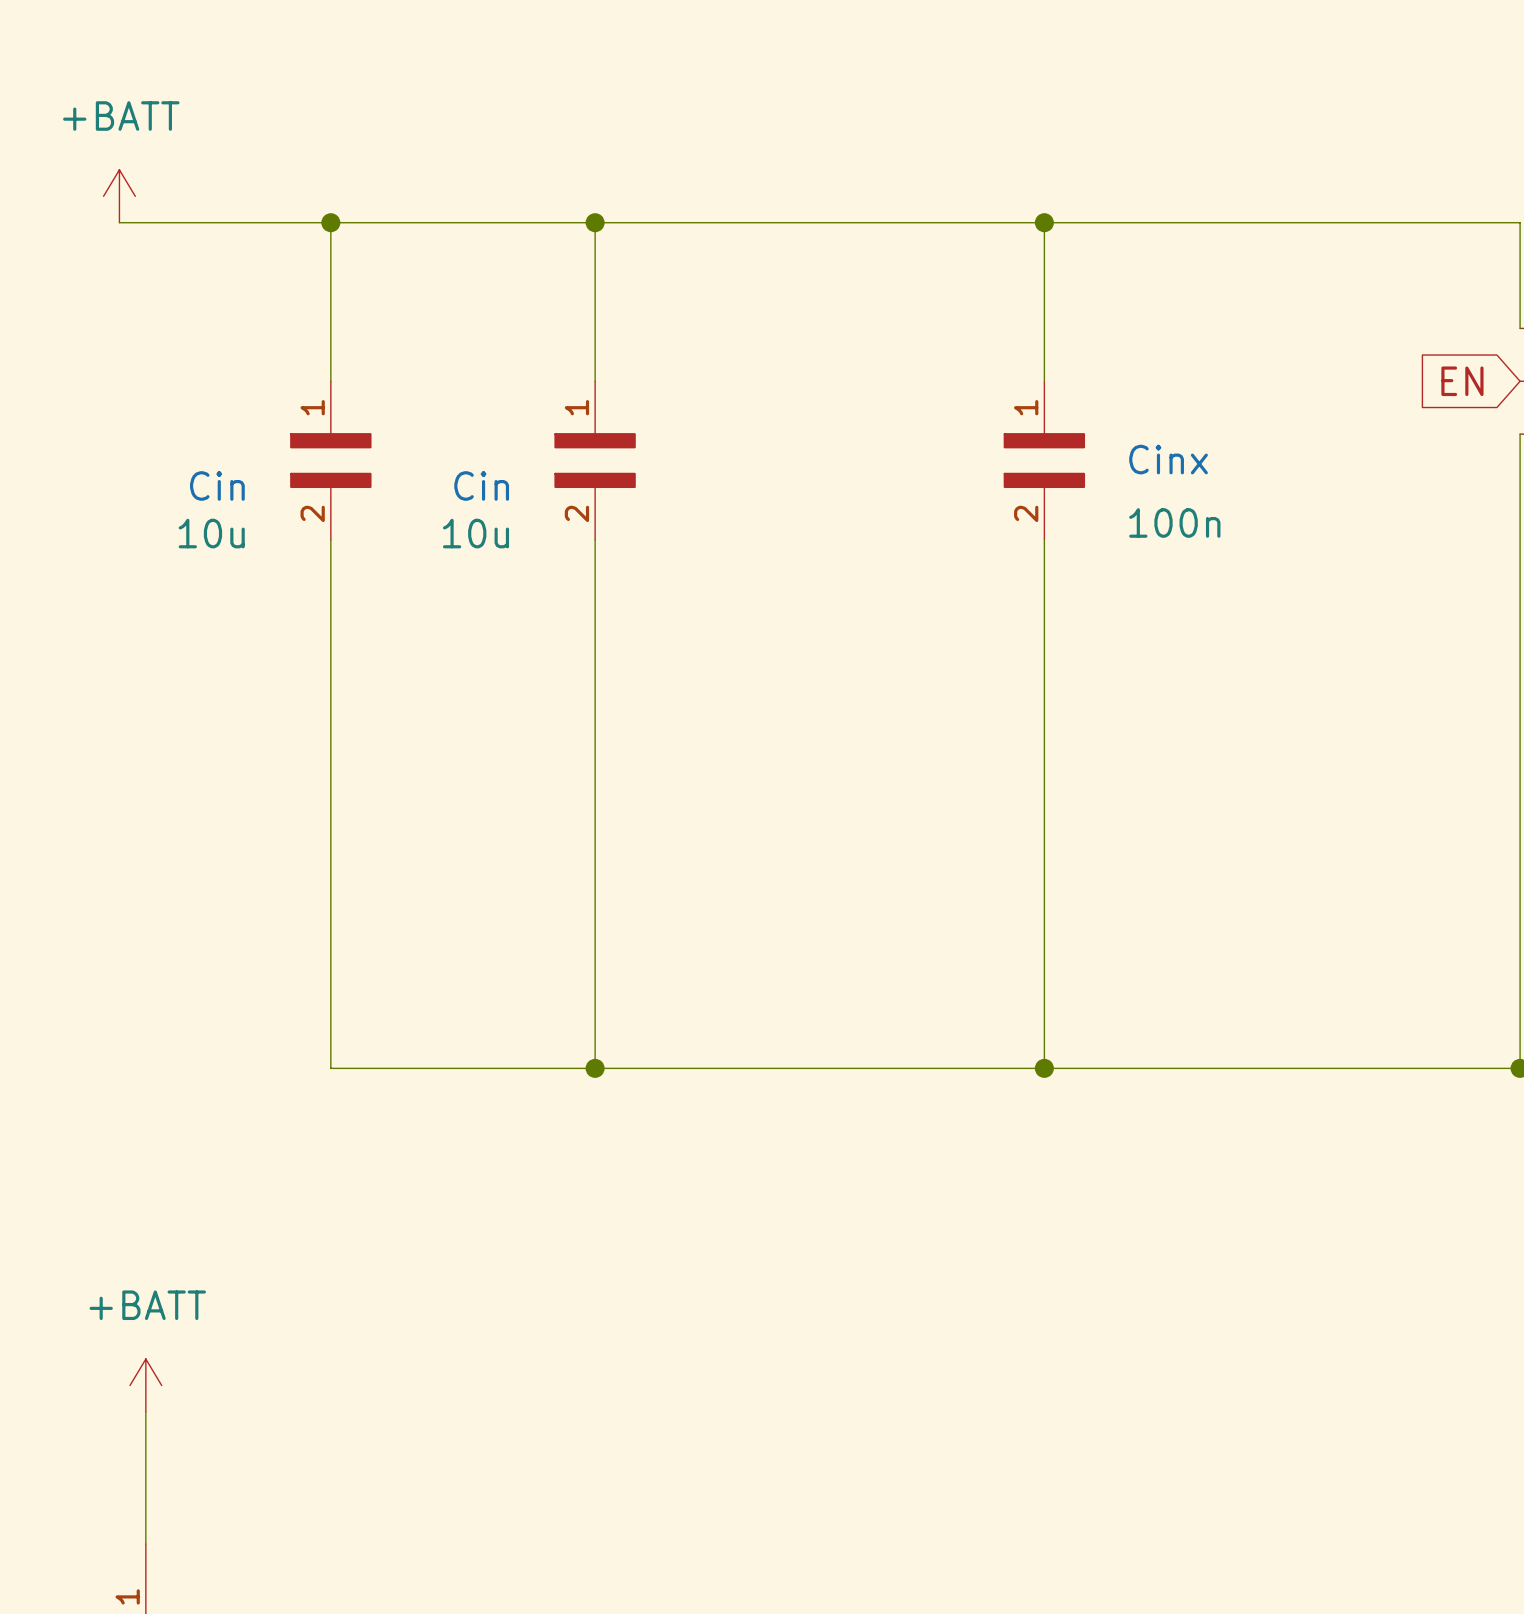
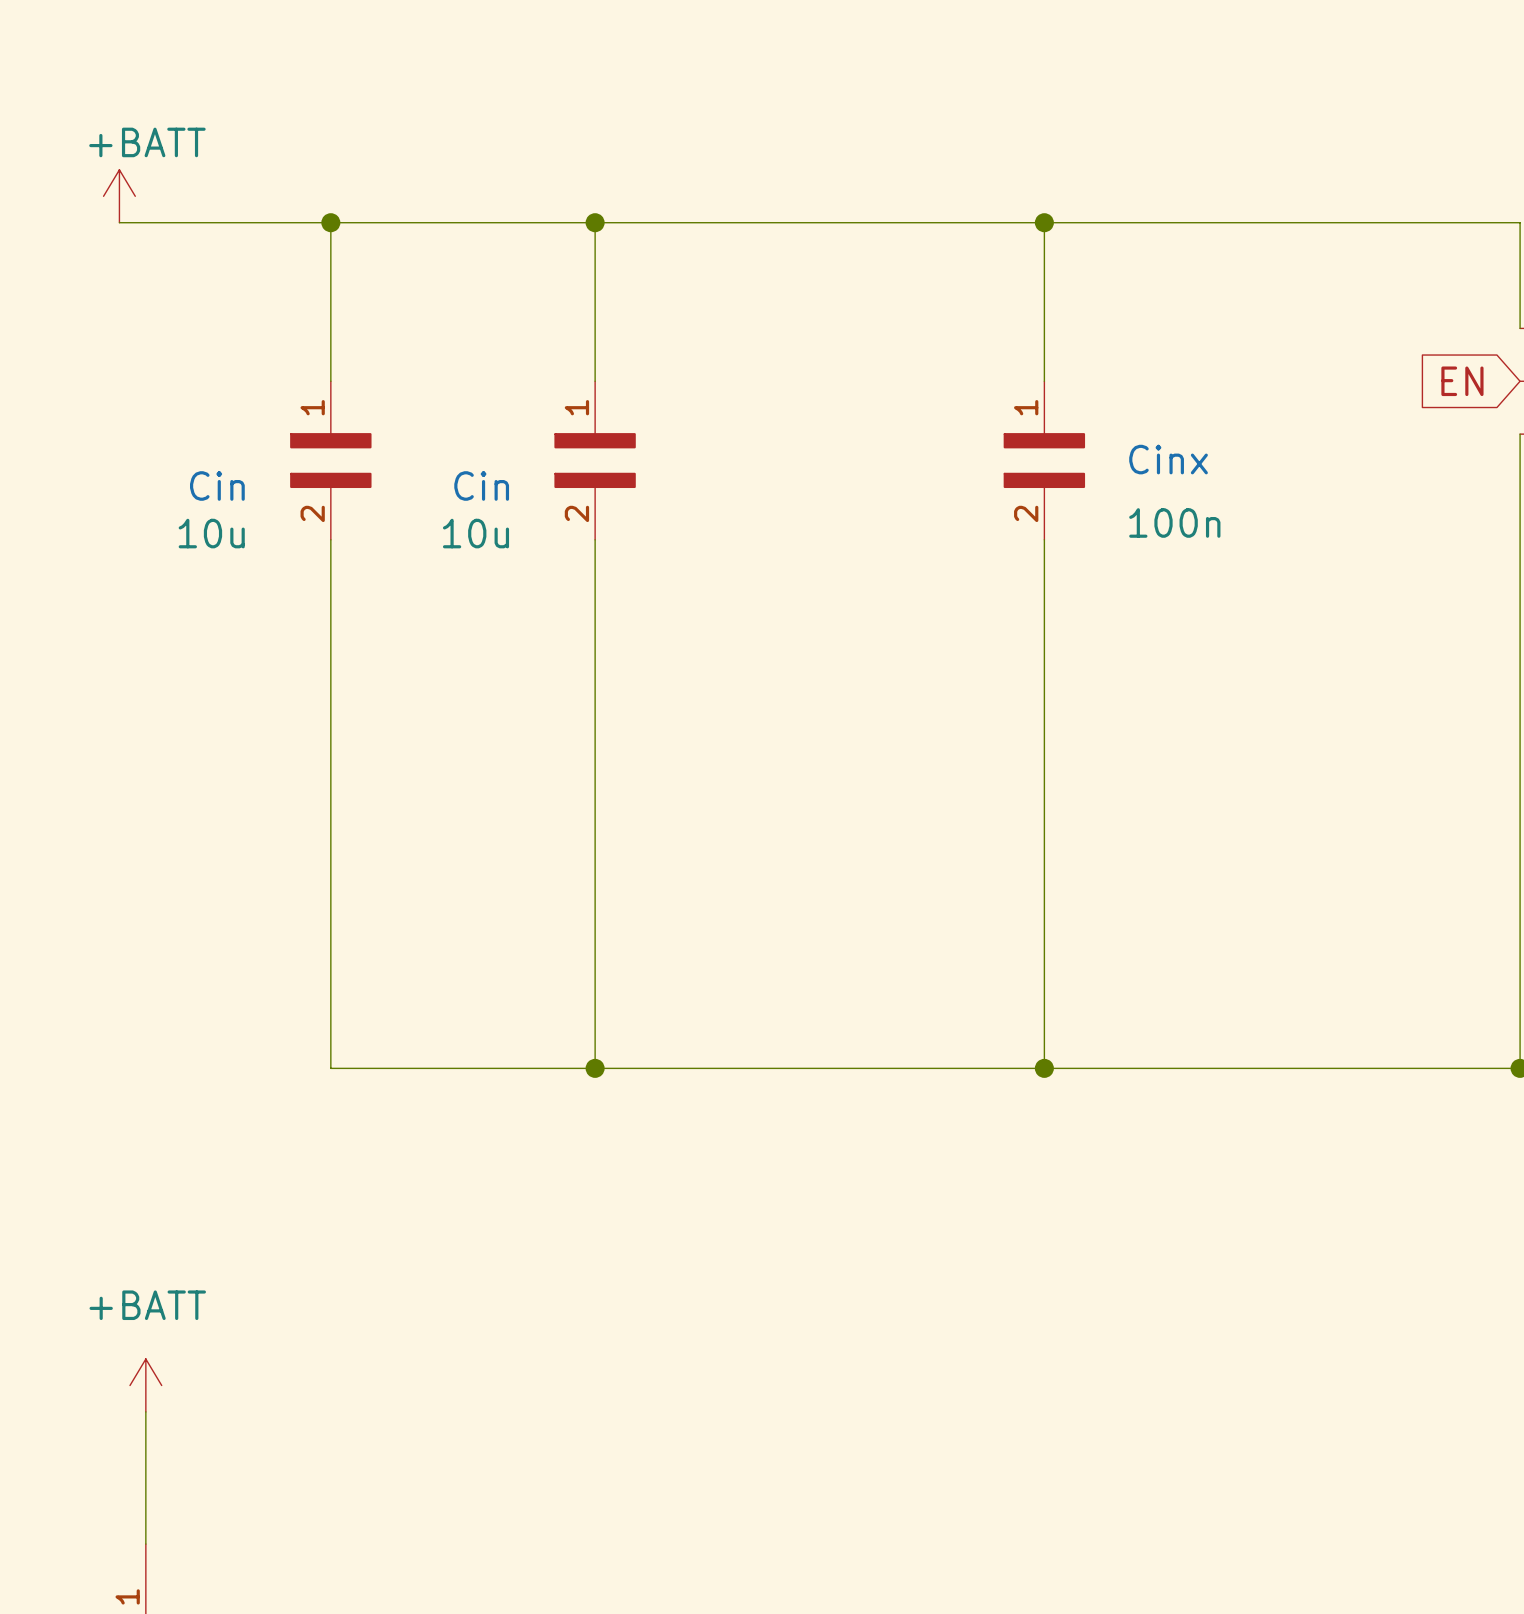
power symbol text position: +BATT (121, 116) -> +BATT (147, 142)

